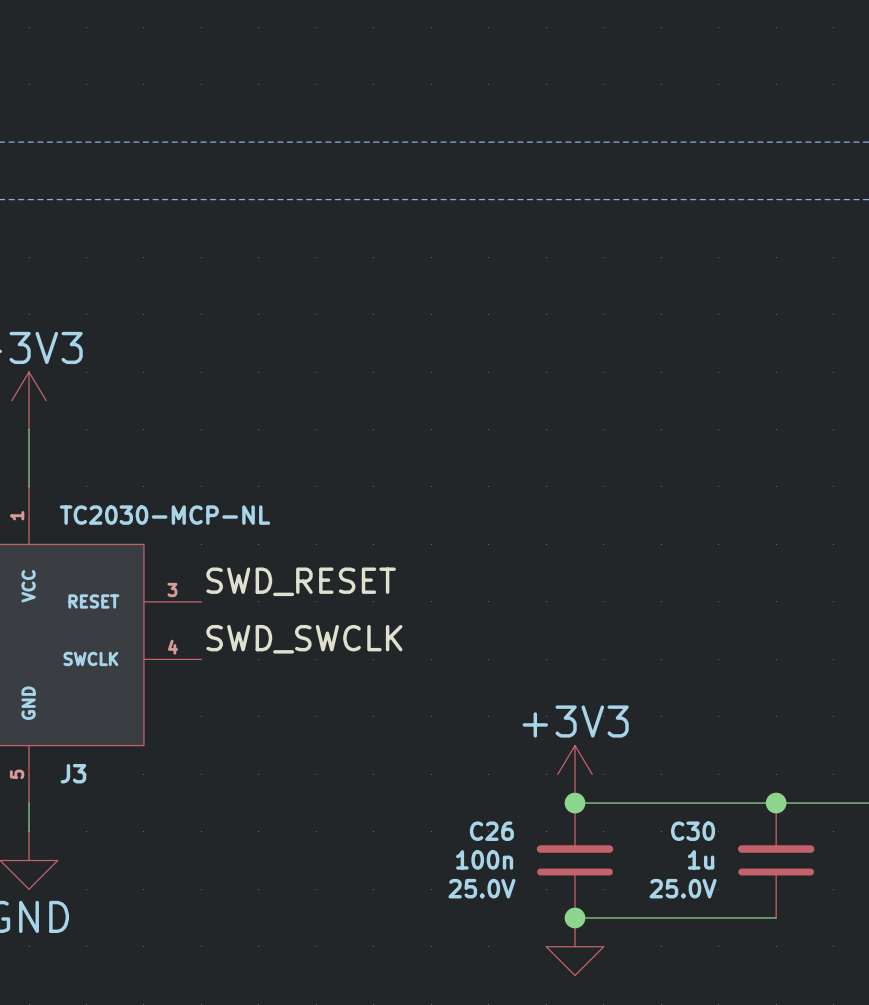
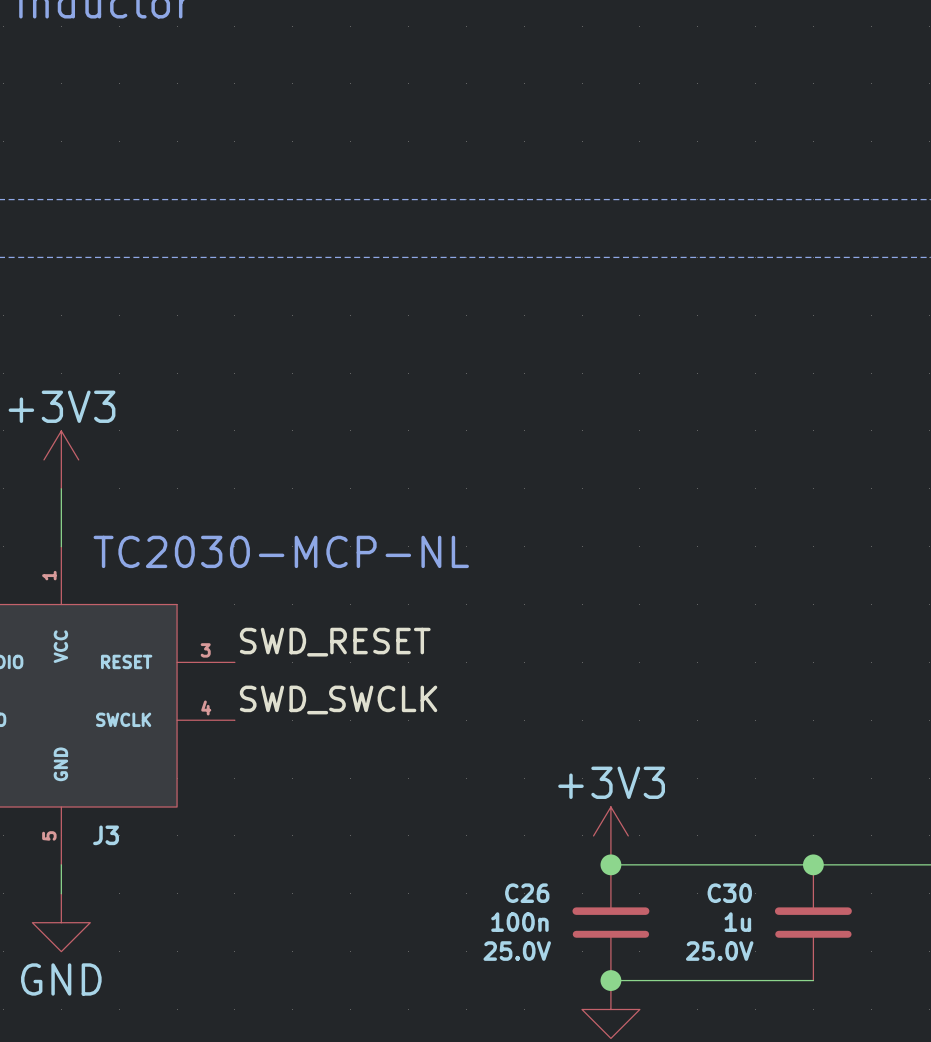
text: none -> TC2030-MCP-NL (281, 551)
J3 value: TC2030-MCP-NL (164, 515) -> none

